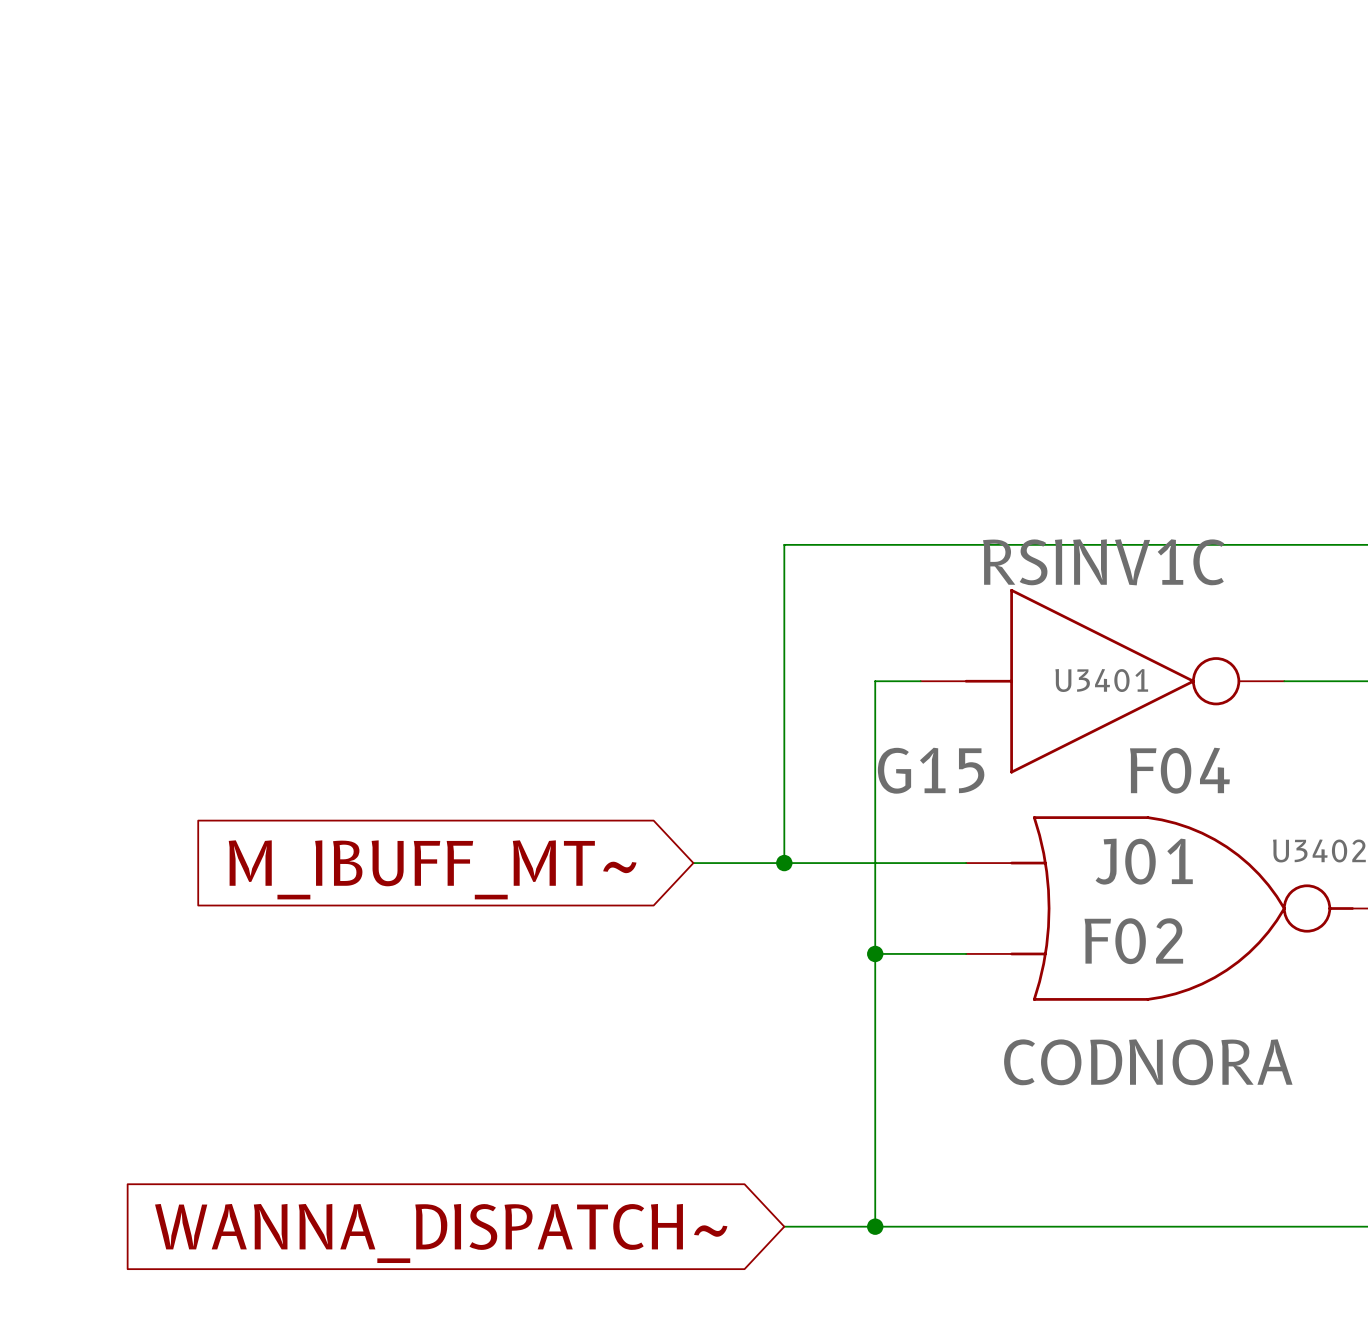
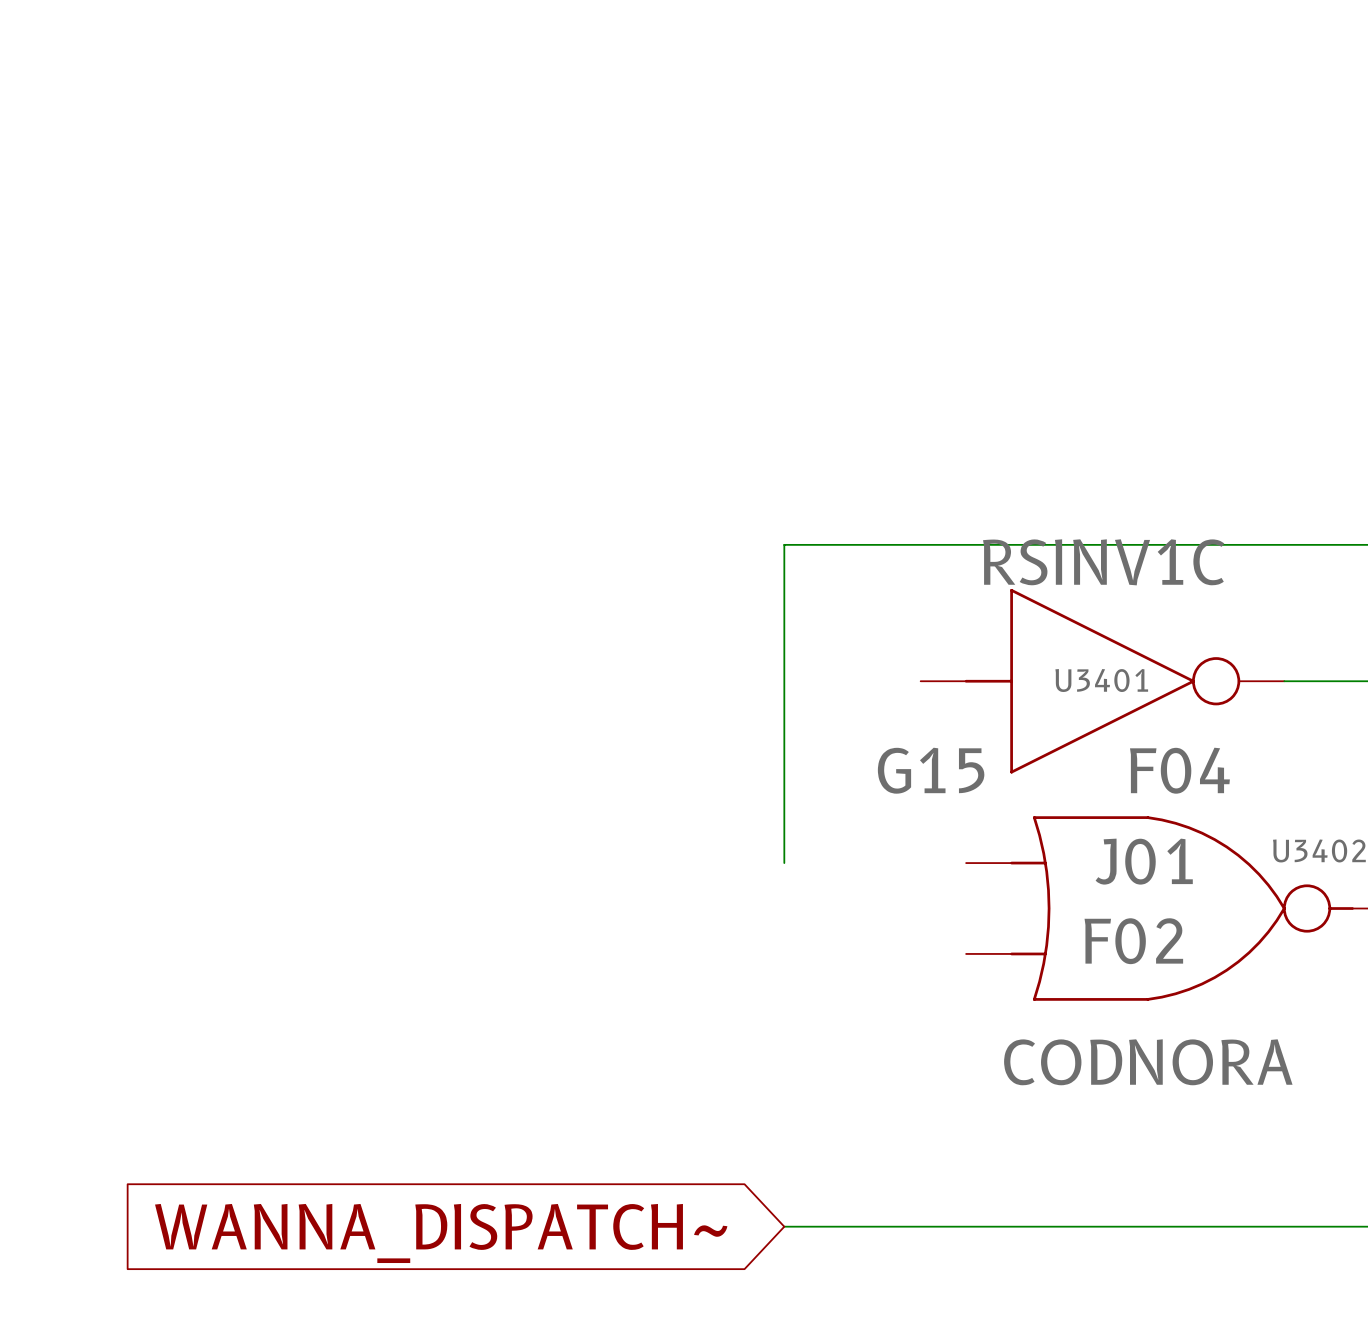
wire: (920, 681) (875, 681) (875, 1226) -> none
wire: (693, 863) (966, 863) -> none
junction: (784, 863) -> none
global label: M_IBUFF_MT~ (432, 869) -> none
wire: (875, 953) (966, 953) -> none
junction: (875, 953) -> none
junction: (875, 1226) -> none

